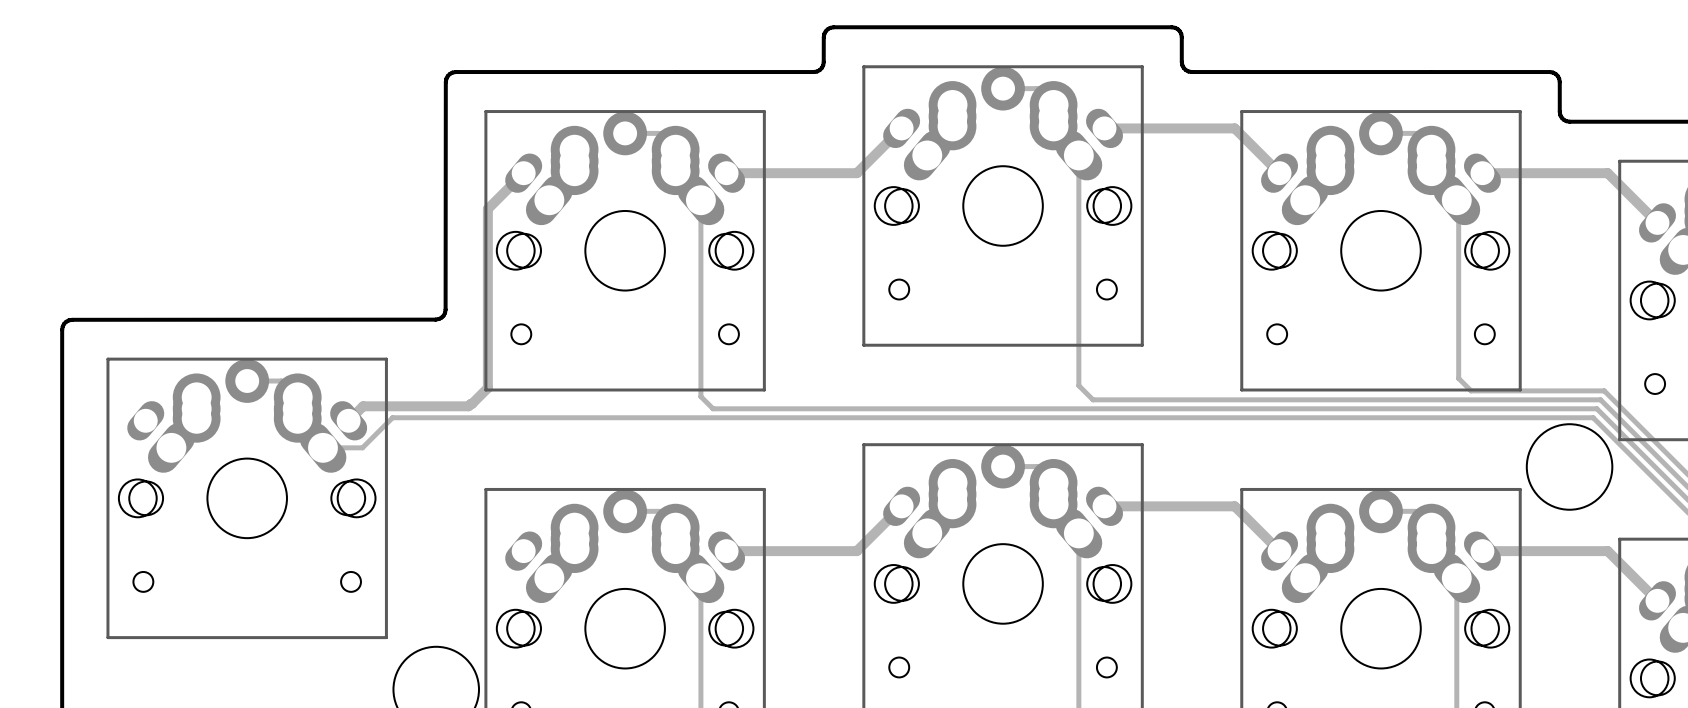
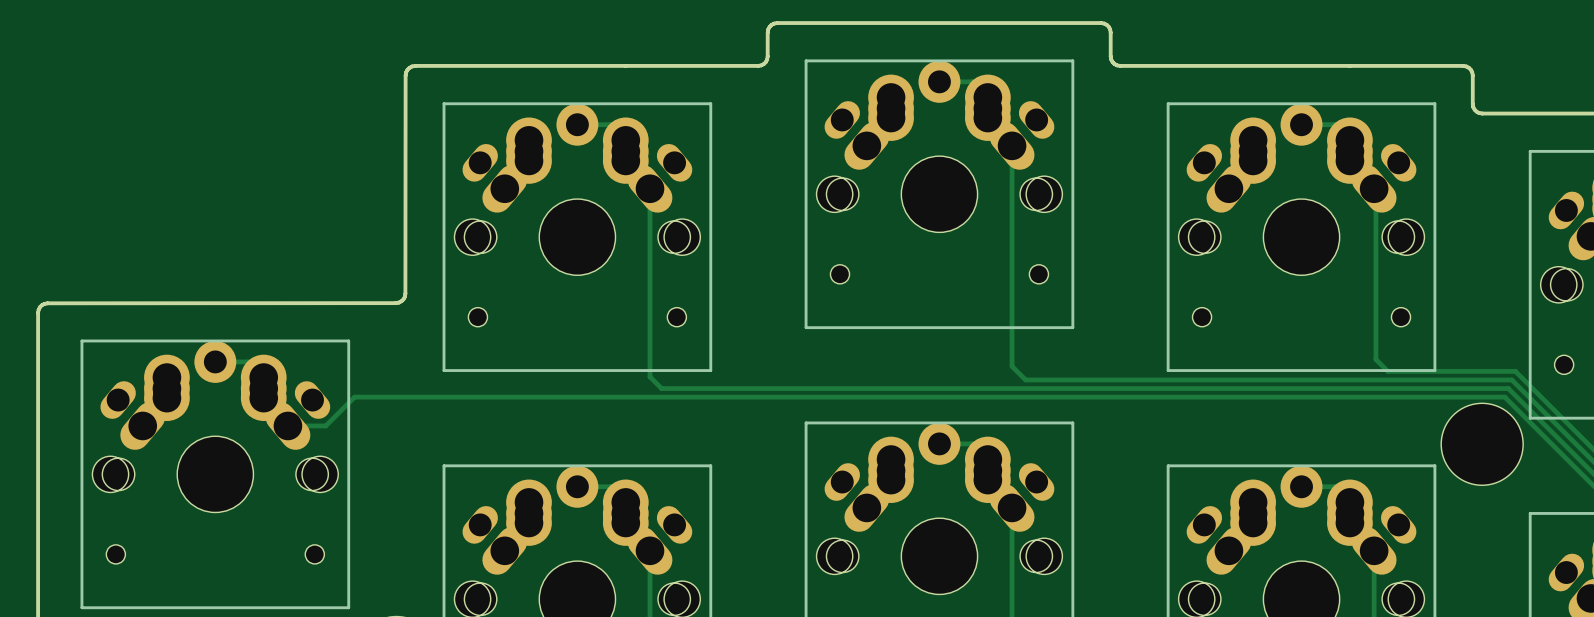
track: (901, 128) (856, 173) (726, 173) -> none
track: (1104, 128) (1234, 128) (1279, 173) -> none
track: (523, 173) (487, 208) (487, 388) (468, 406) (363, 406) (348, 420) -> none
track: (1482, 173) (1607, 173) (1657, 222) -> none
track: (901, 506) (856, 551) (726, 551) -> none
track: (1104, 506) (1234, 506) (1279, 551) -> none
track: (1482, 551) (1607, 551) (1657, 600) -> none

